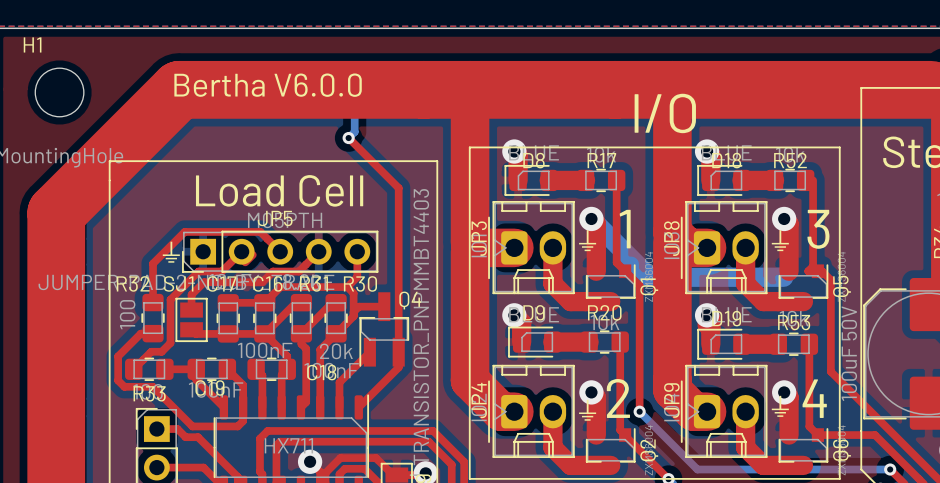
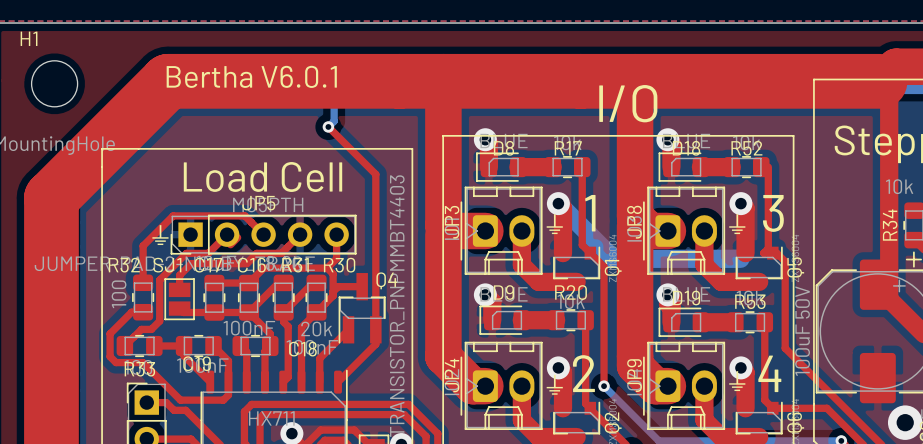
text: Bertha V6.0.0 (268, 85) -> Bertha V6.0.1 (251, 76)

